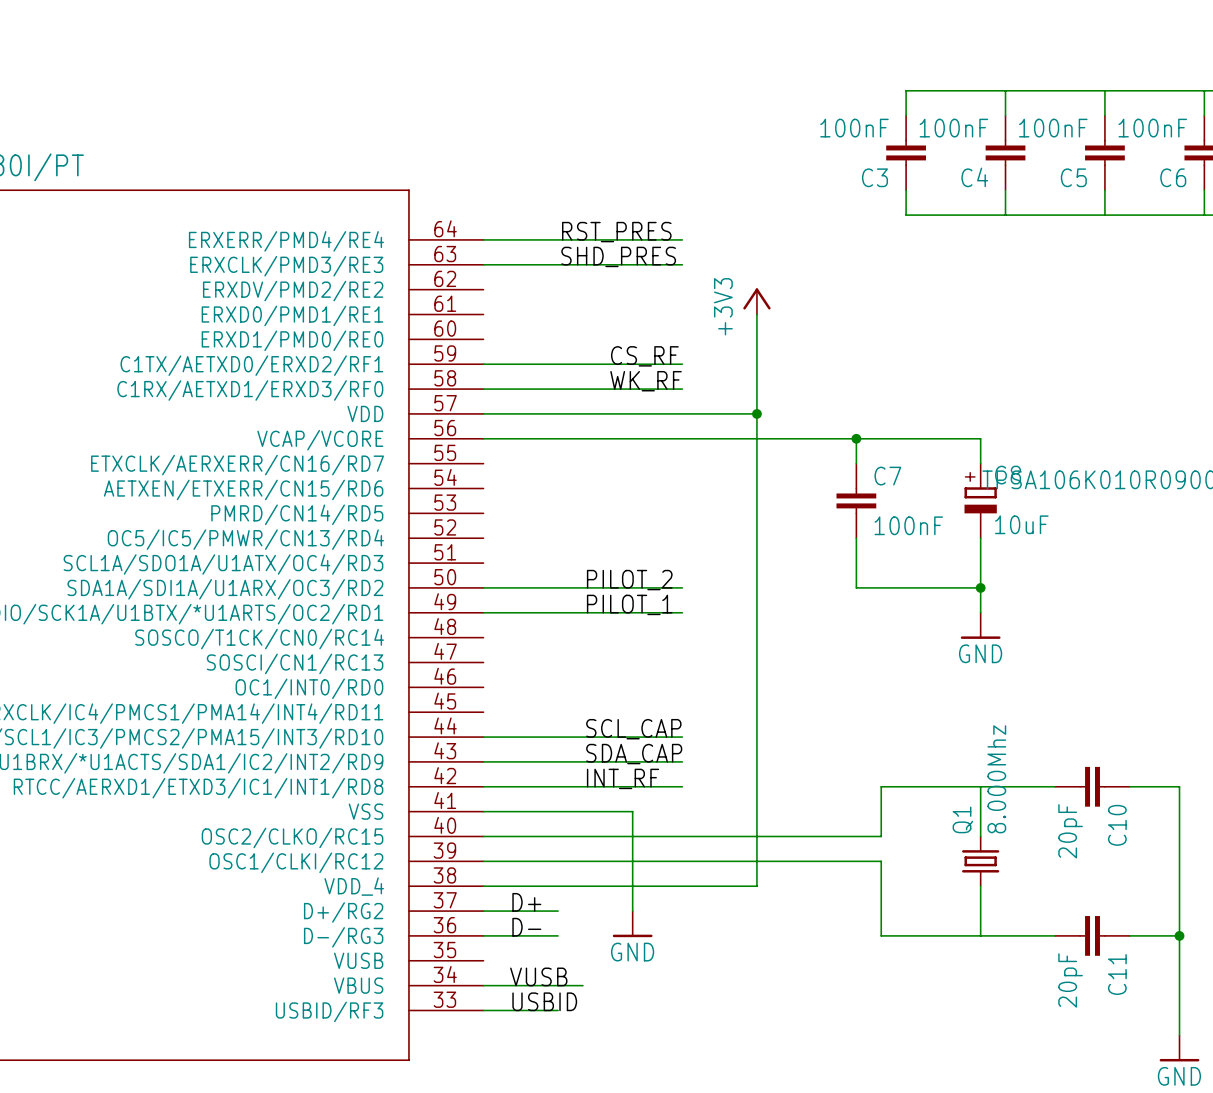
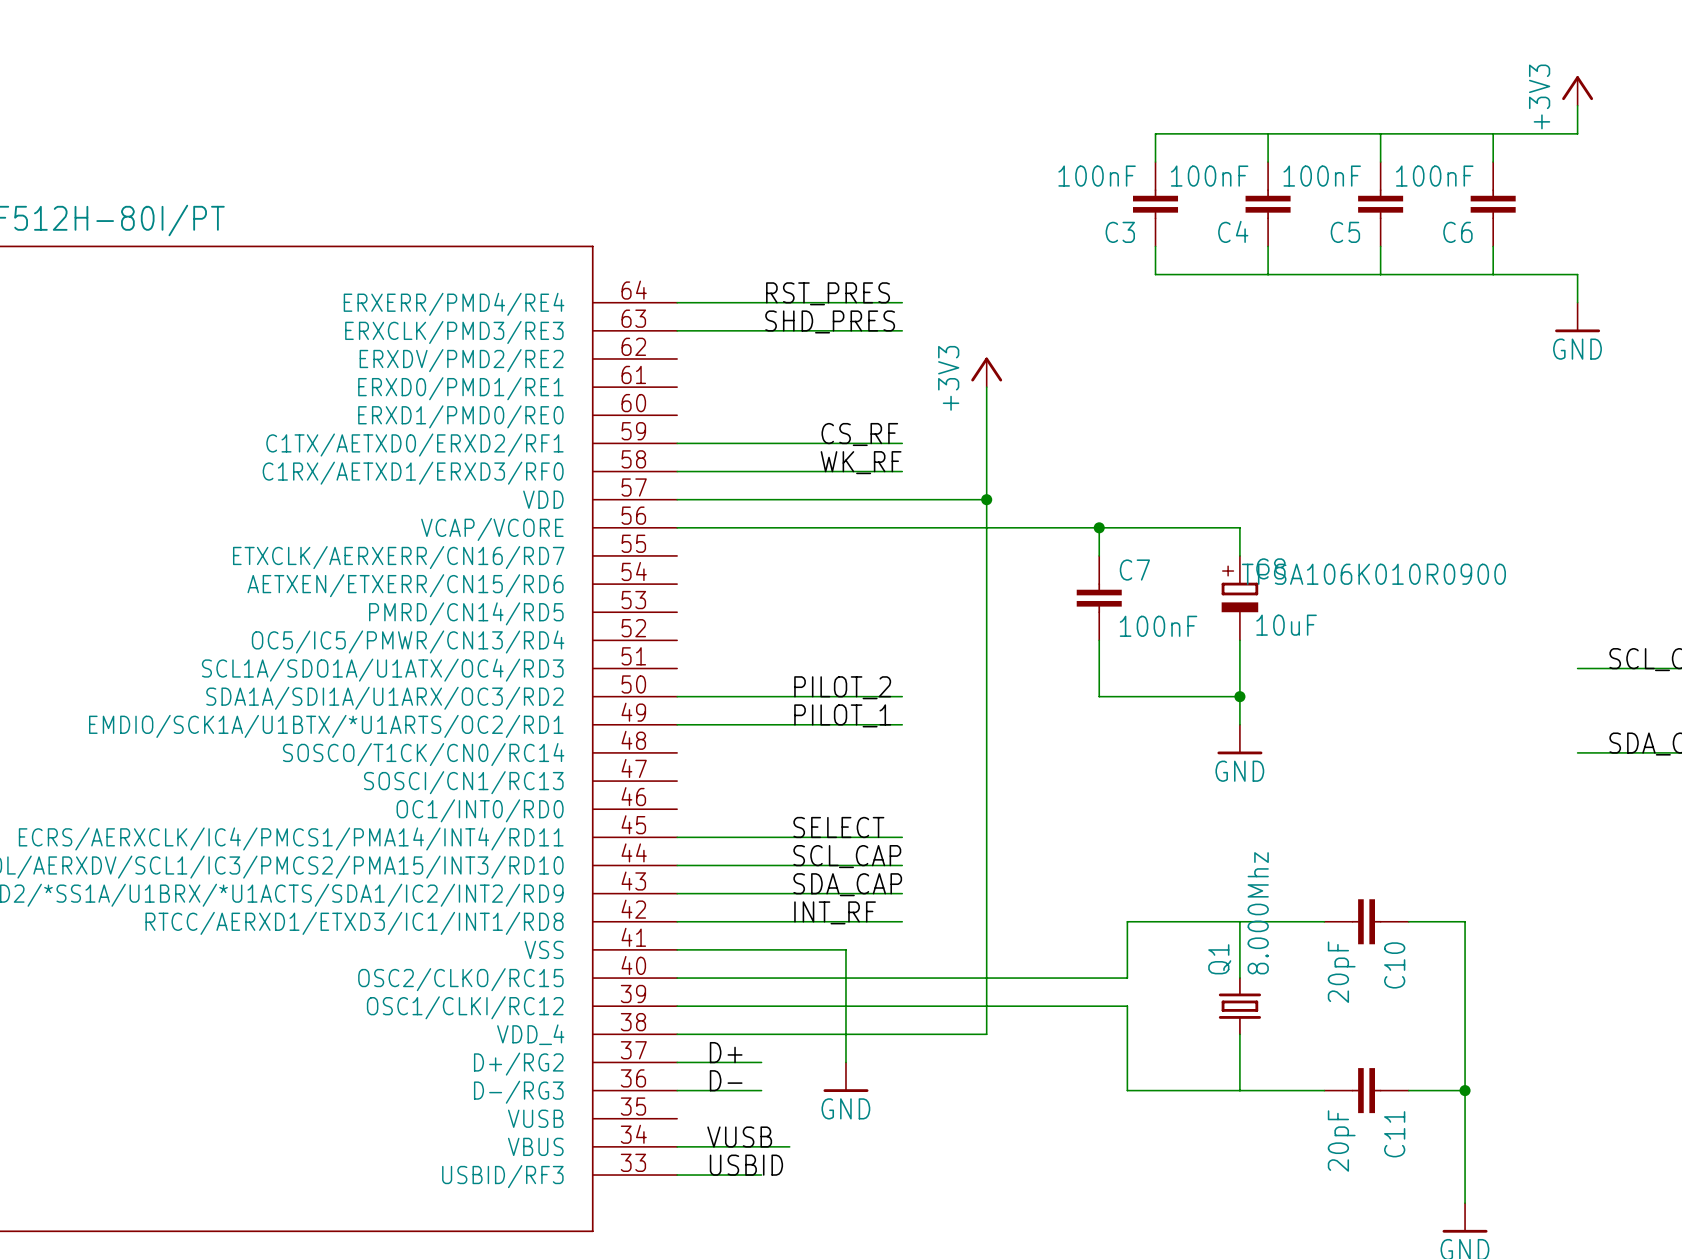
label: none -> SELECT (838, 827)
wire: none -> (677, 837) (902, 837)

